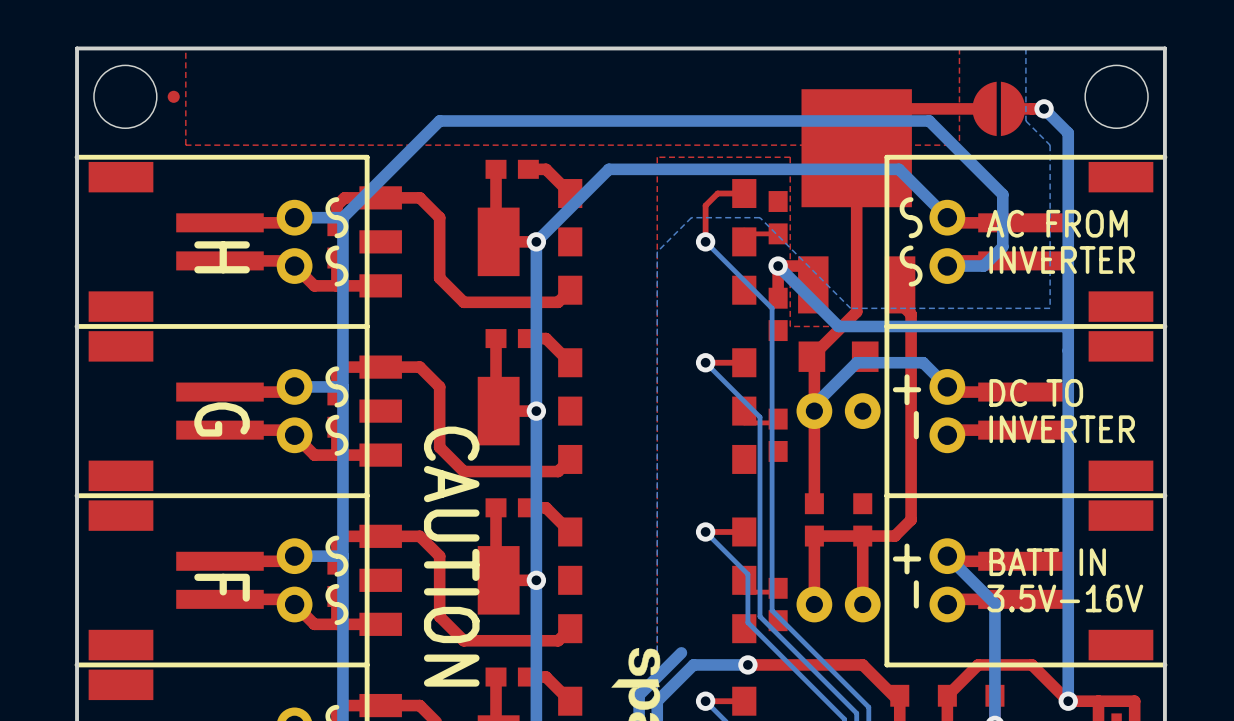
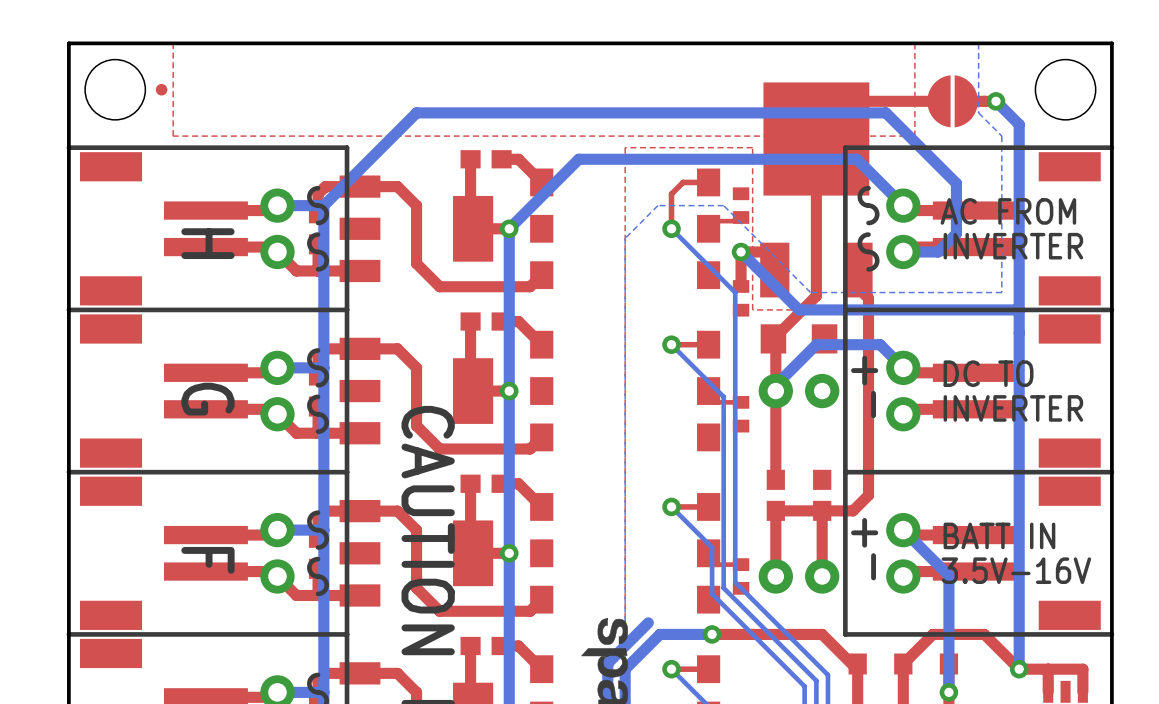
part footprint: [768, 191, 788, 245] -> [732, 187, 750, 224]
part footprint: [768, 287, 788, 342] -> [732, 280, 750, 317]
part footprint: [768, 408, 788, 462] -> [732, 395, 750, 433]
part footprint: [768, 577, 788, 632] -> [732, 558, 750, 595]

